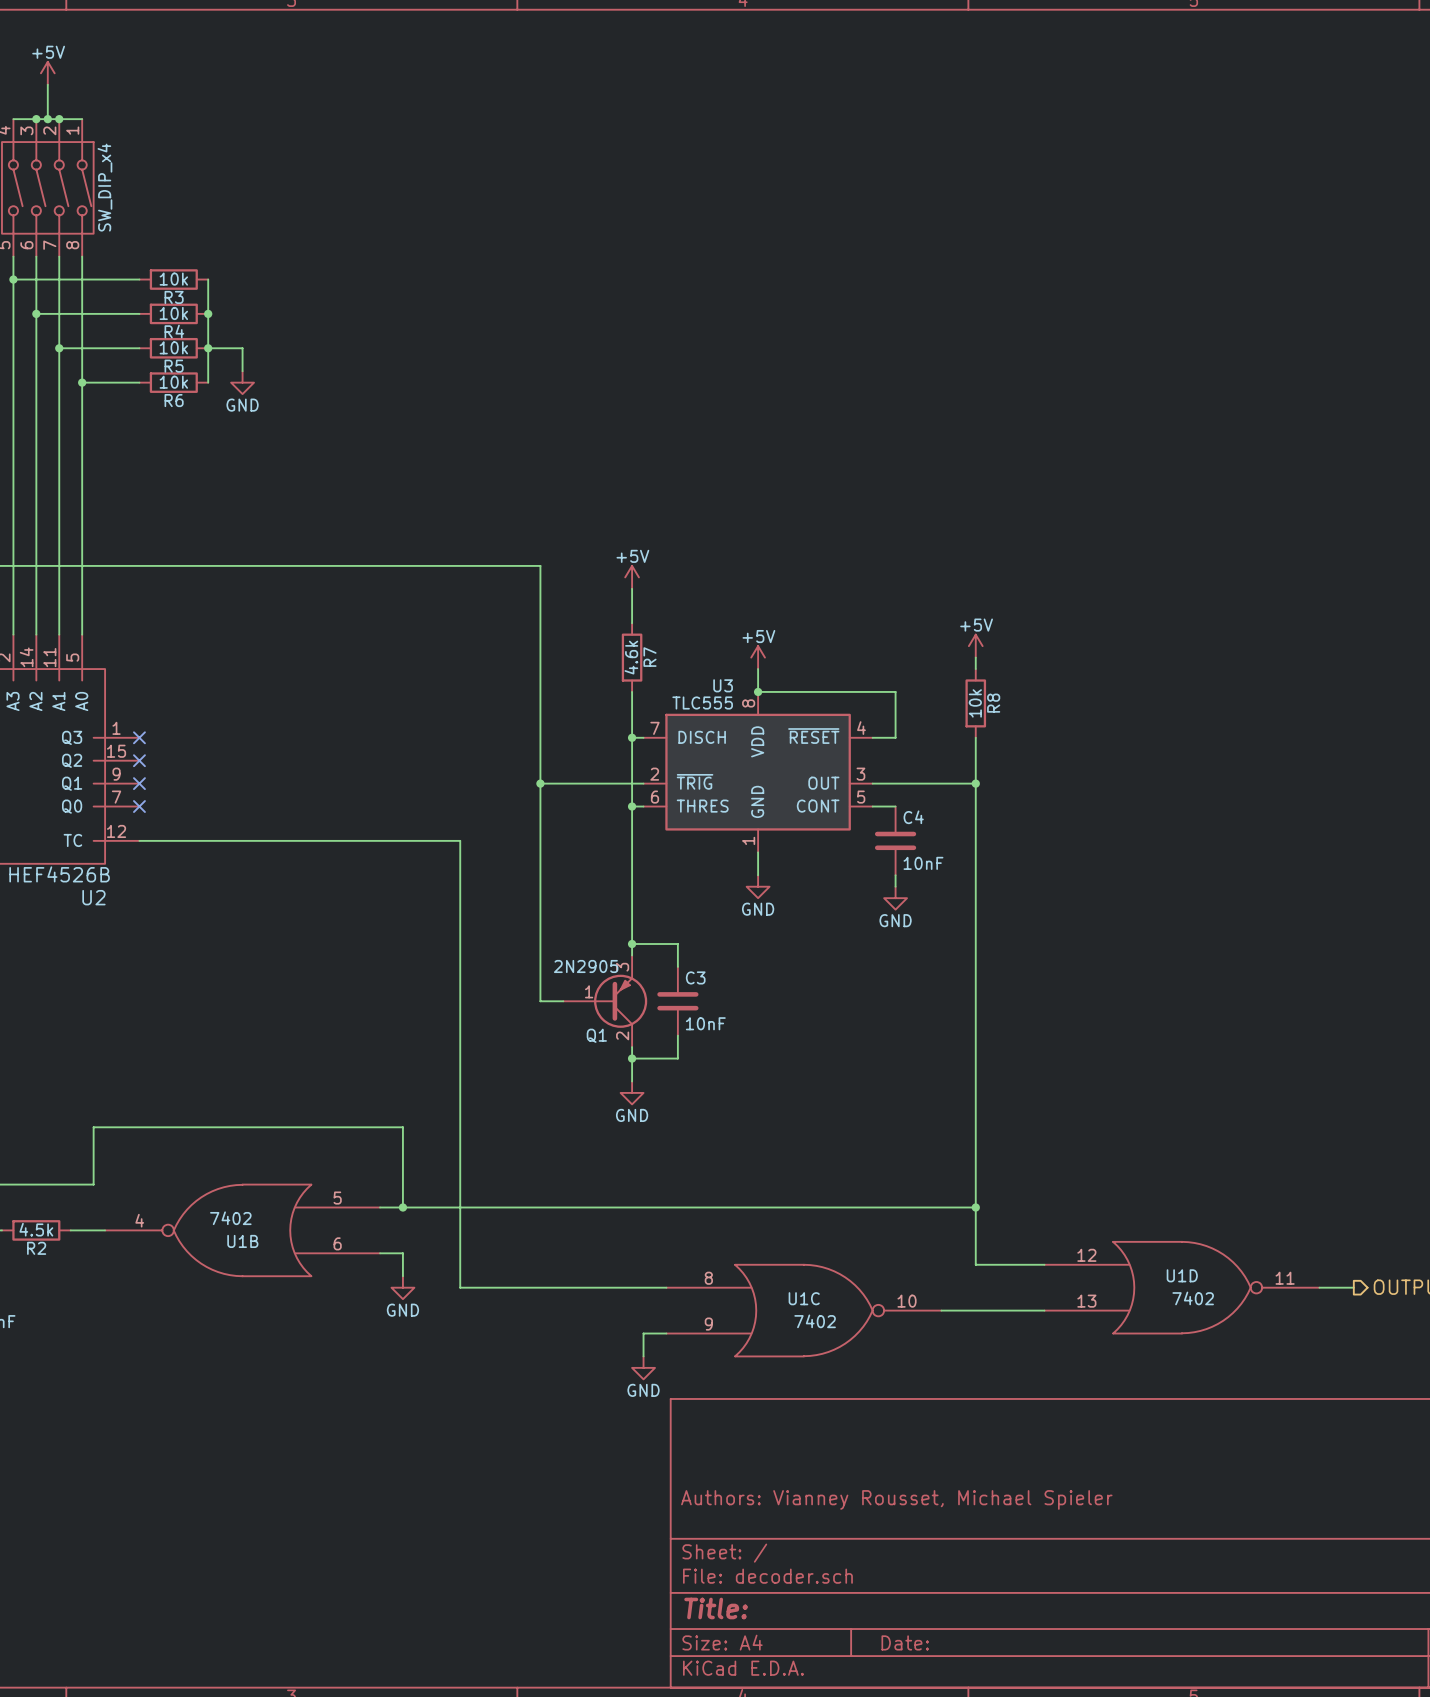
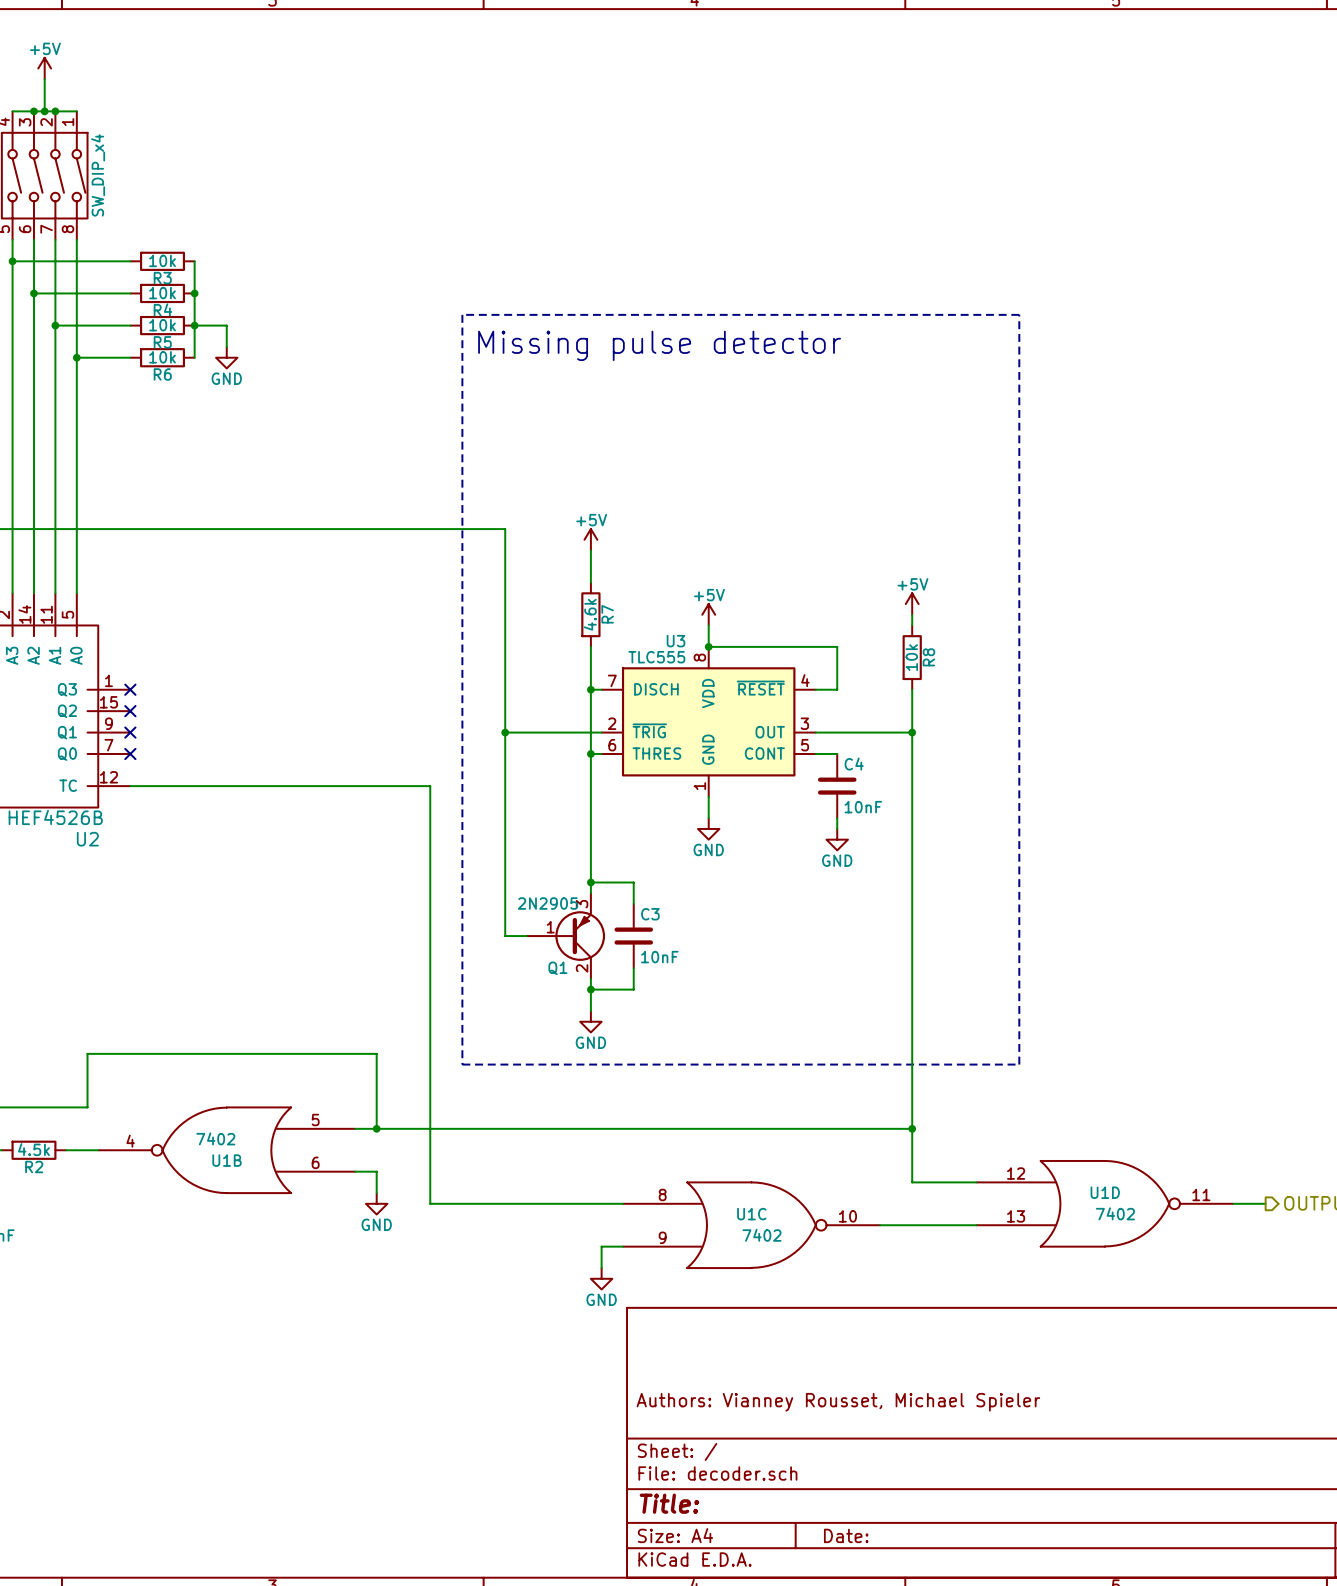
line: none -> (462, 314) (462, 1064) (1019, 1064) (1019, 314) (462, 314)
text: none -> Missing pulse detector (659, 345)

